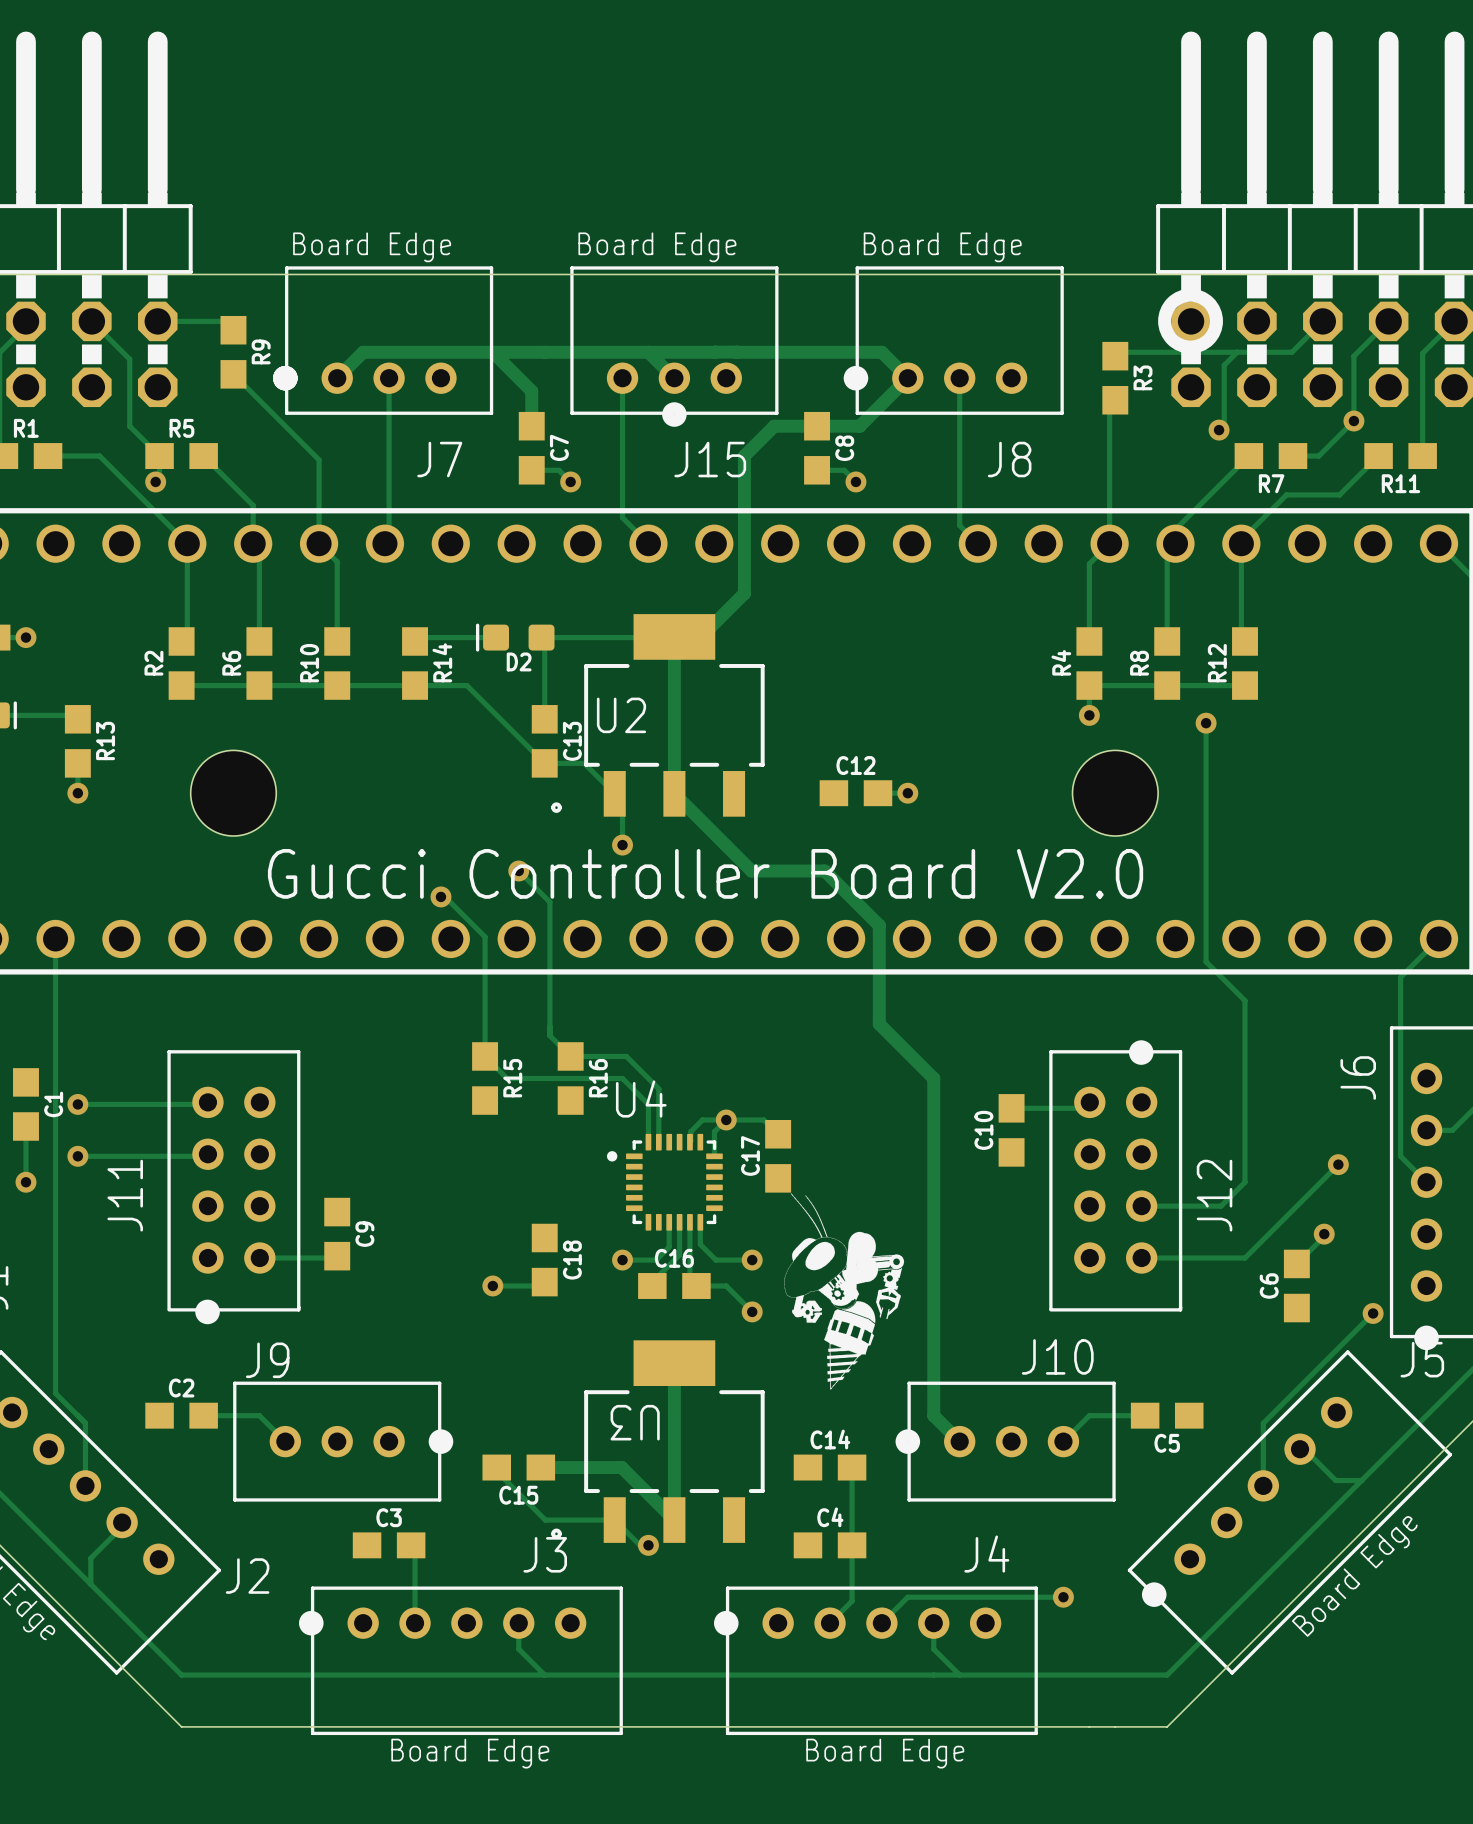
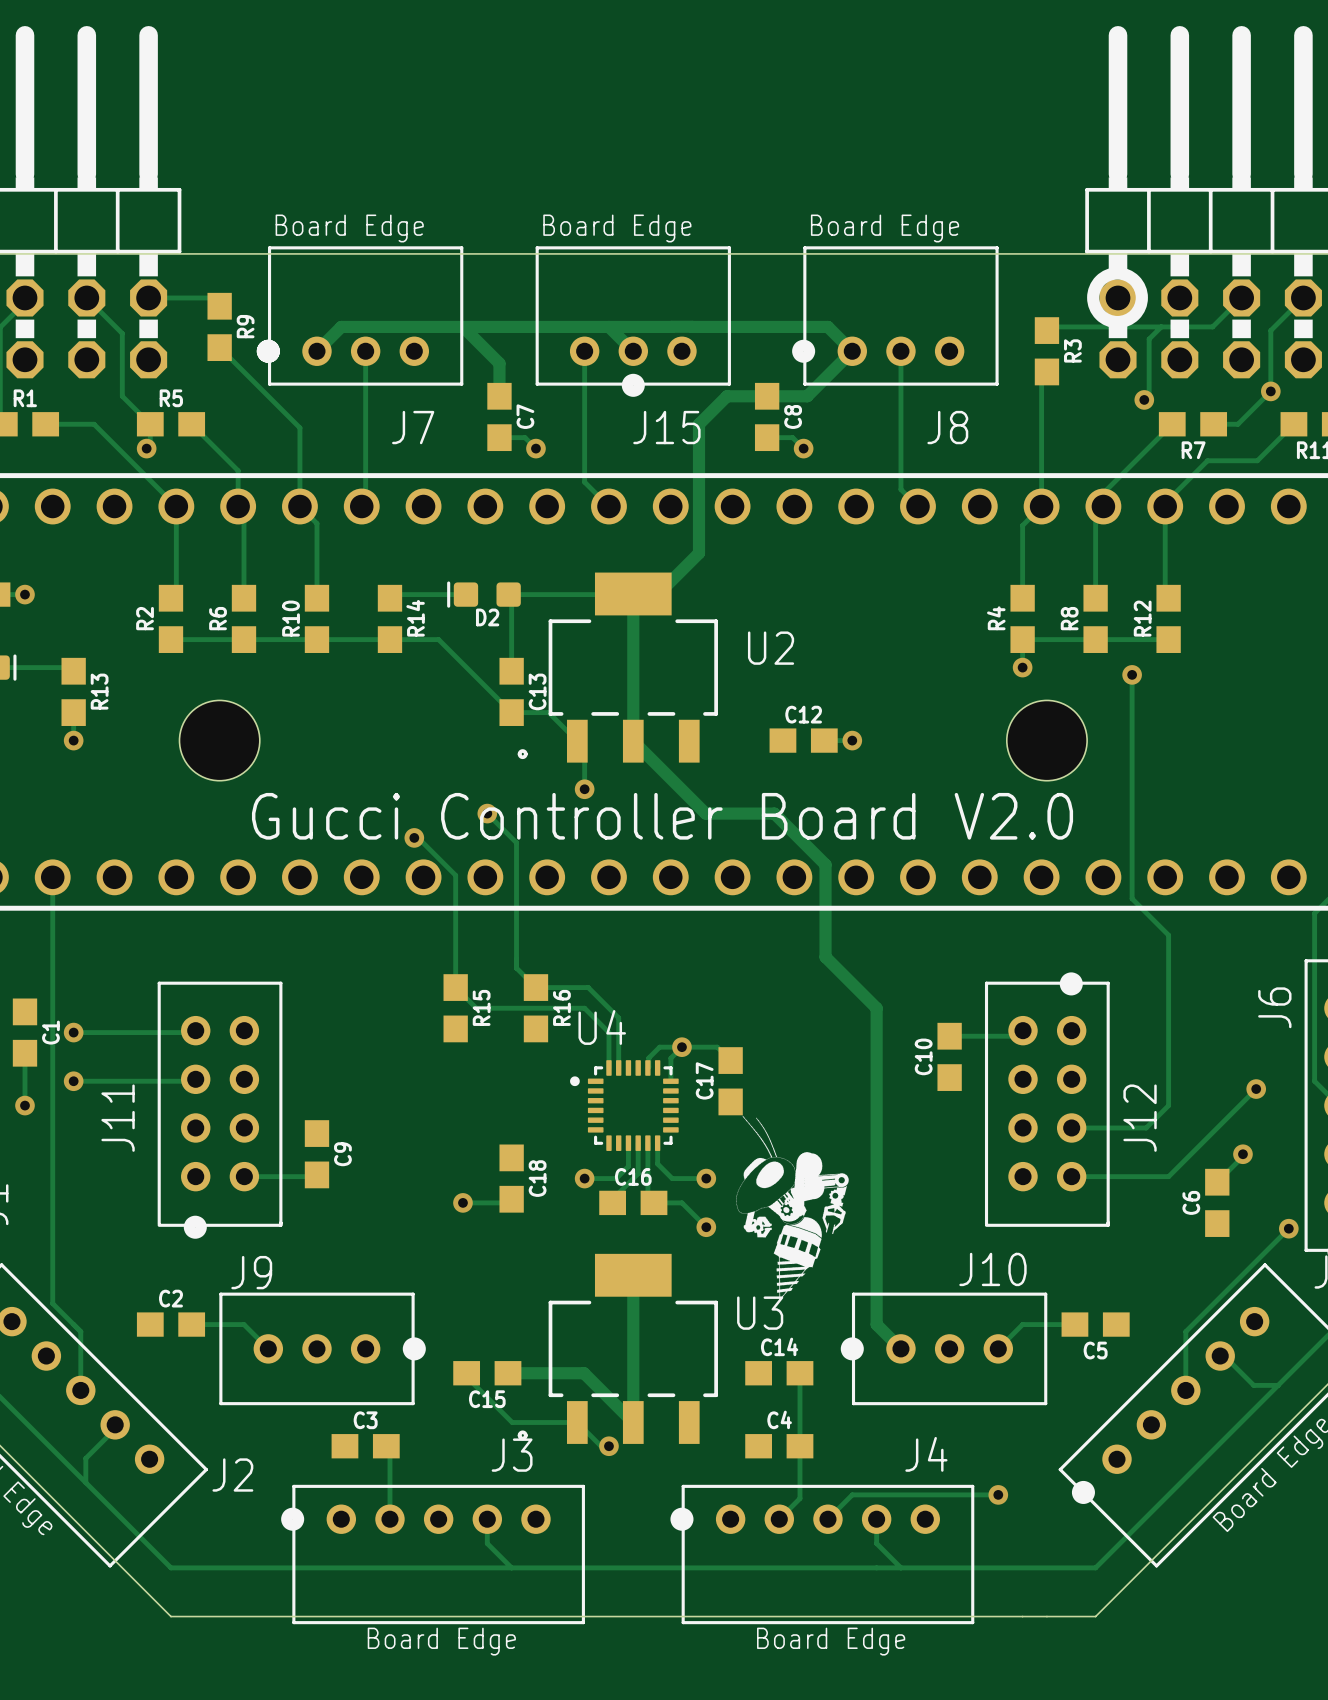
U2 name position: U2 (621, 715) -> U2 (771, 648)
U3 name rotation: 0° (635, 1422) -> 180° (760, 1313)
U3 name position: U3 (635, 1422) -> U3 (760, 1313)

